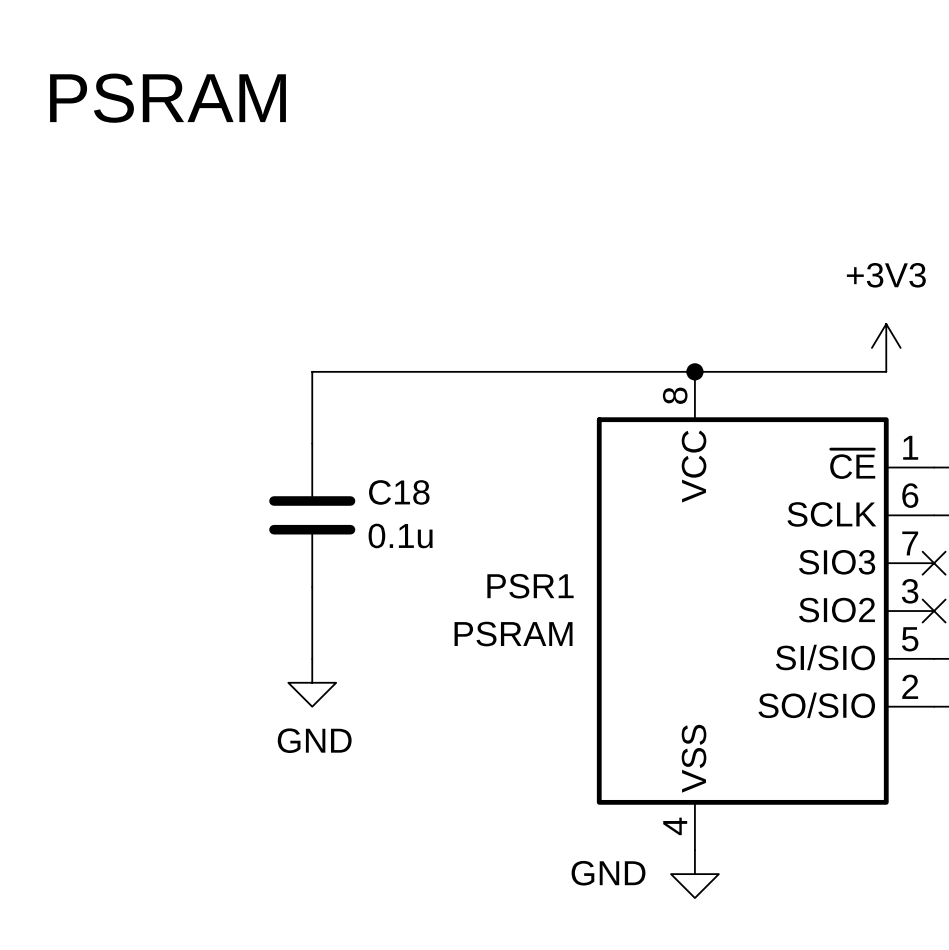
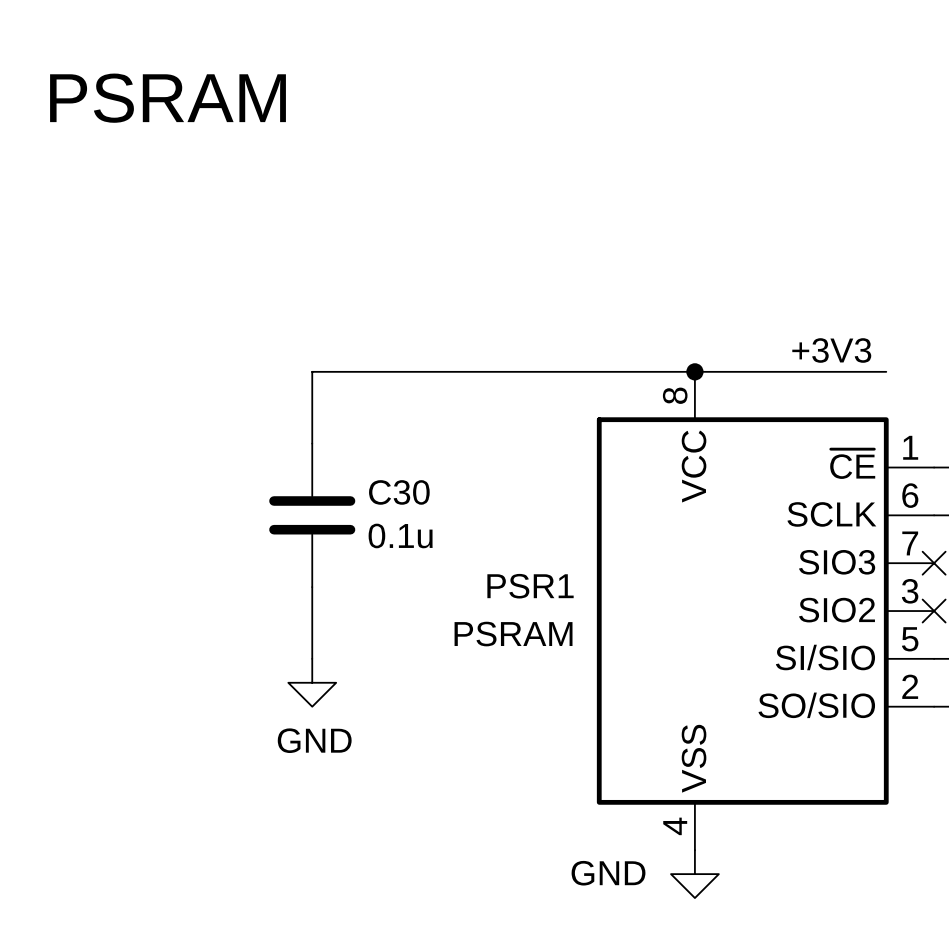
power symbol: +3V3 (886, 347) -> none
label: none -> +3V3 (831, 350)
C18 name: C18 (399, 492) -> C30 (399, 492)

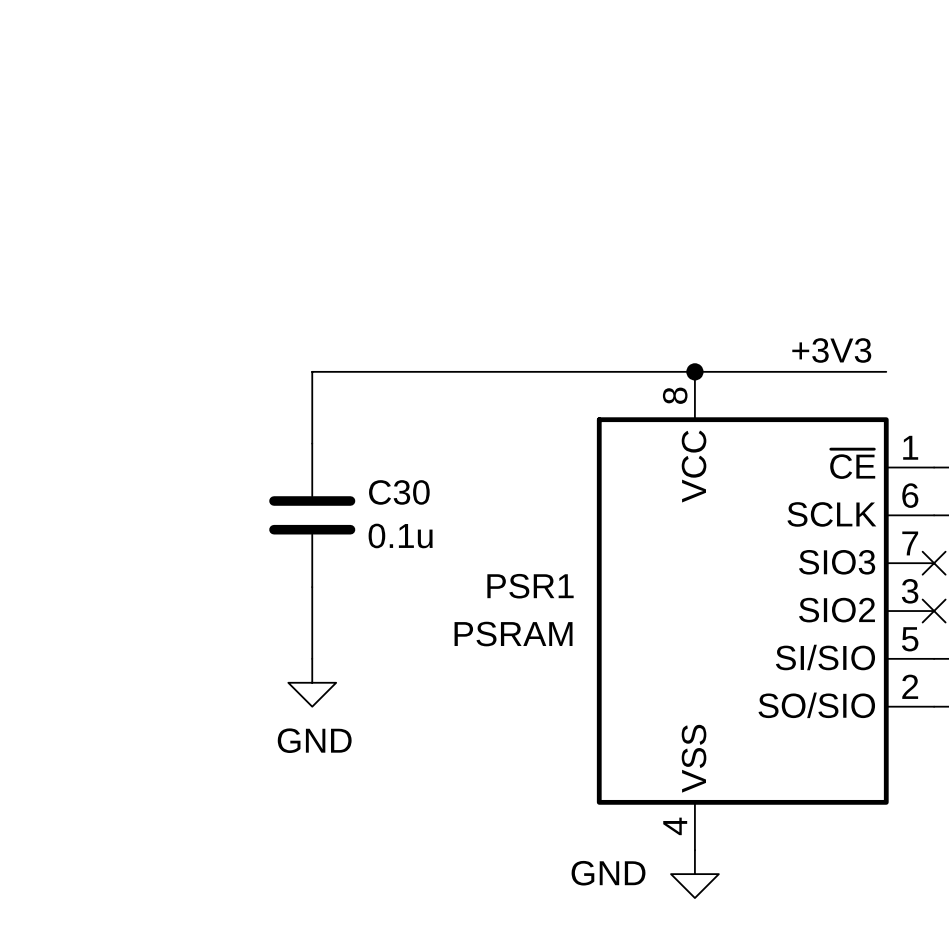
text: PSRAM (168, 98) -> none

